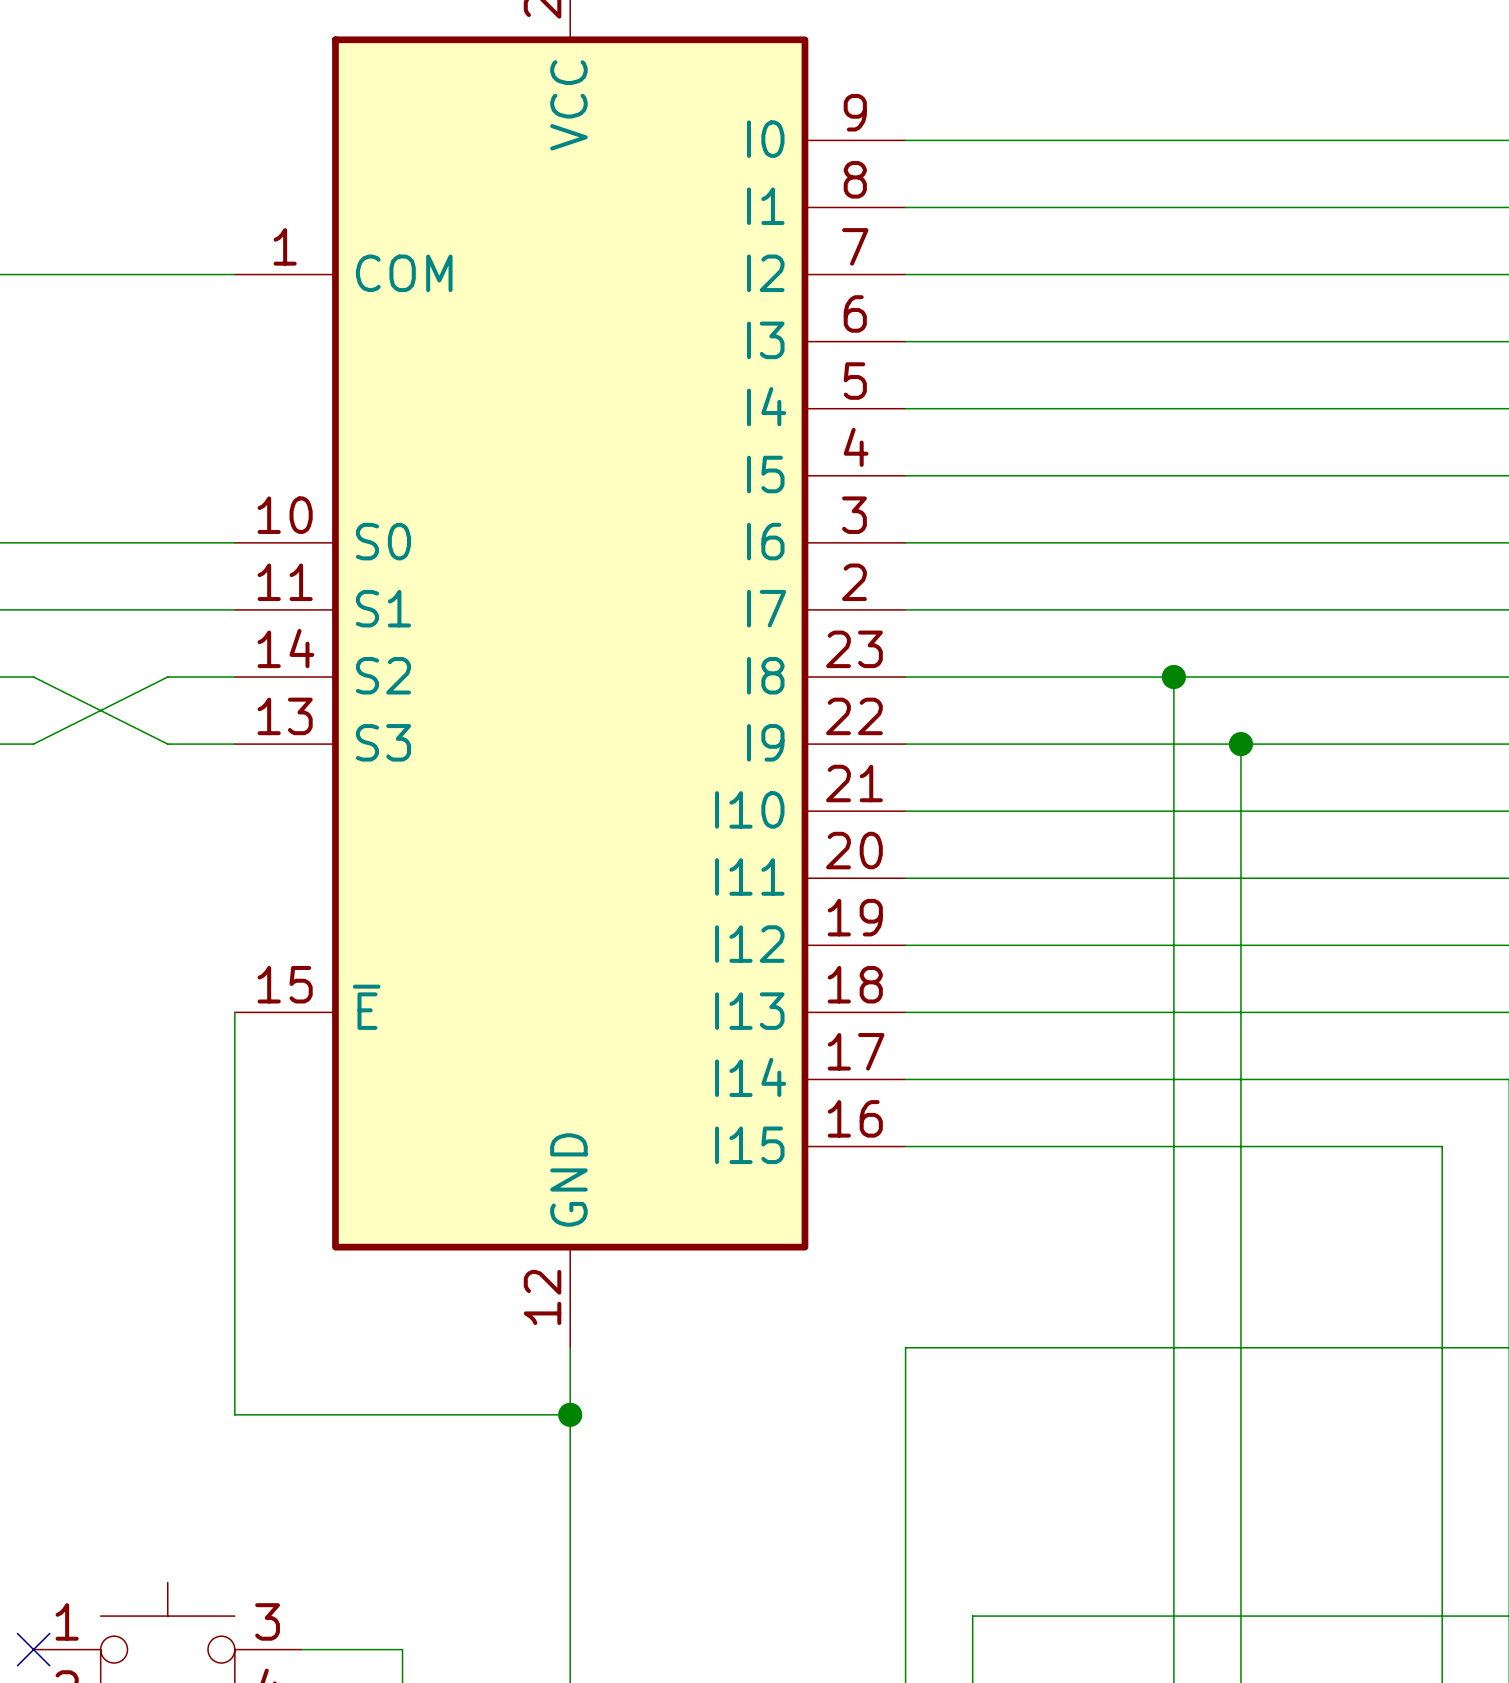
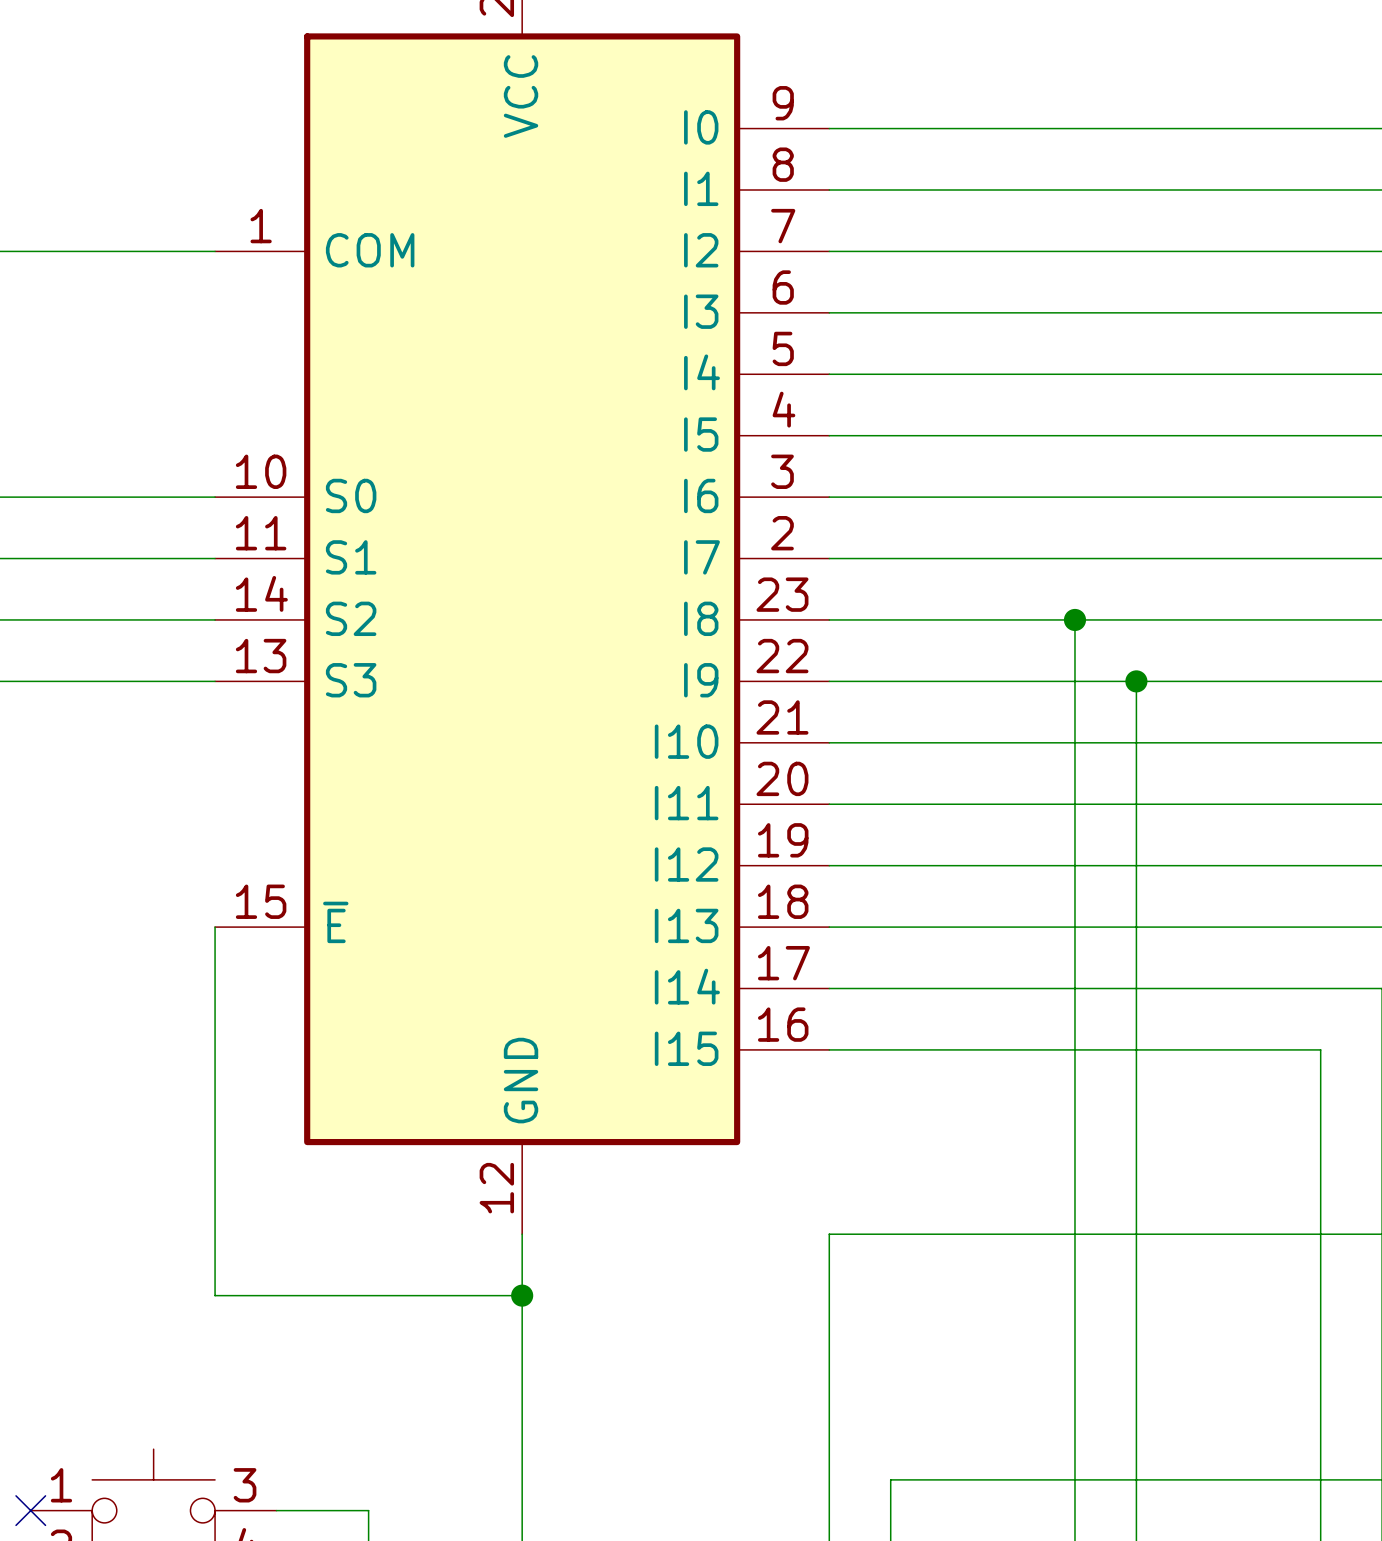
wire: (33, 677) (167, 744) -> (30, 619) (153, 619)
wire: (167, 677) (33, 744) -> (153, 681) (30, 681)

